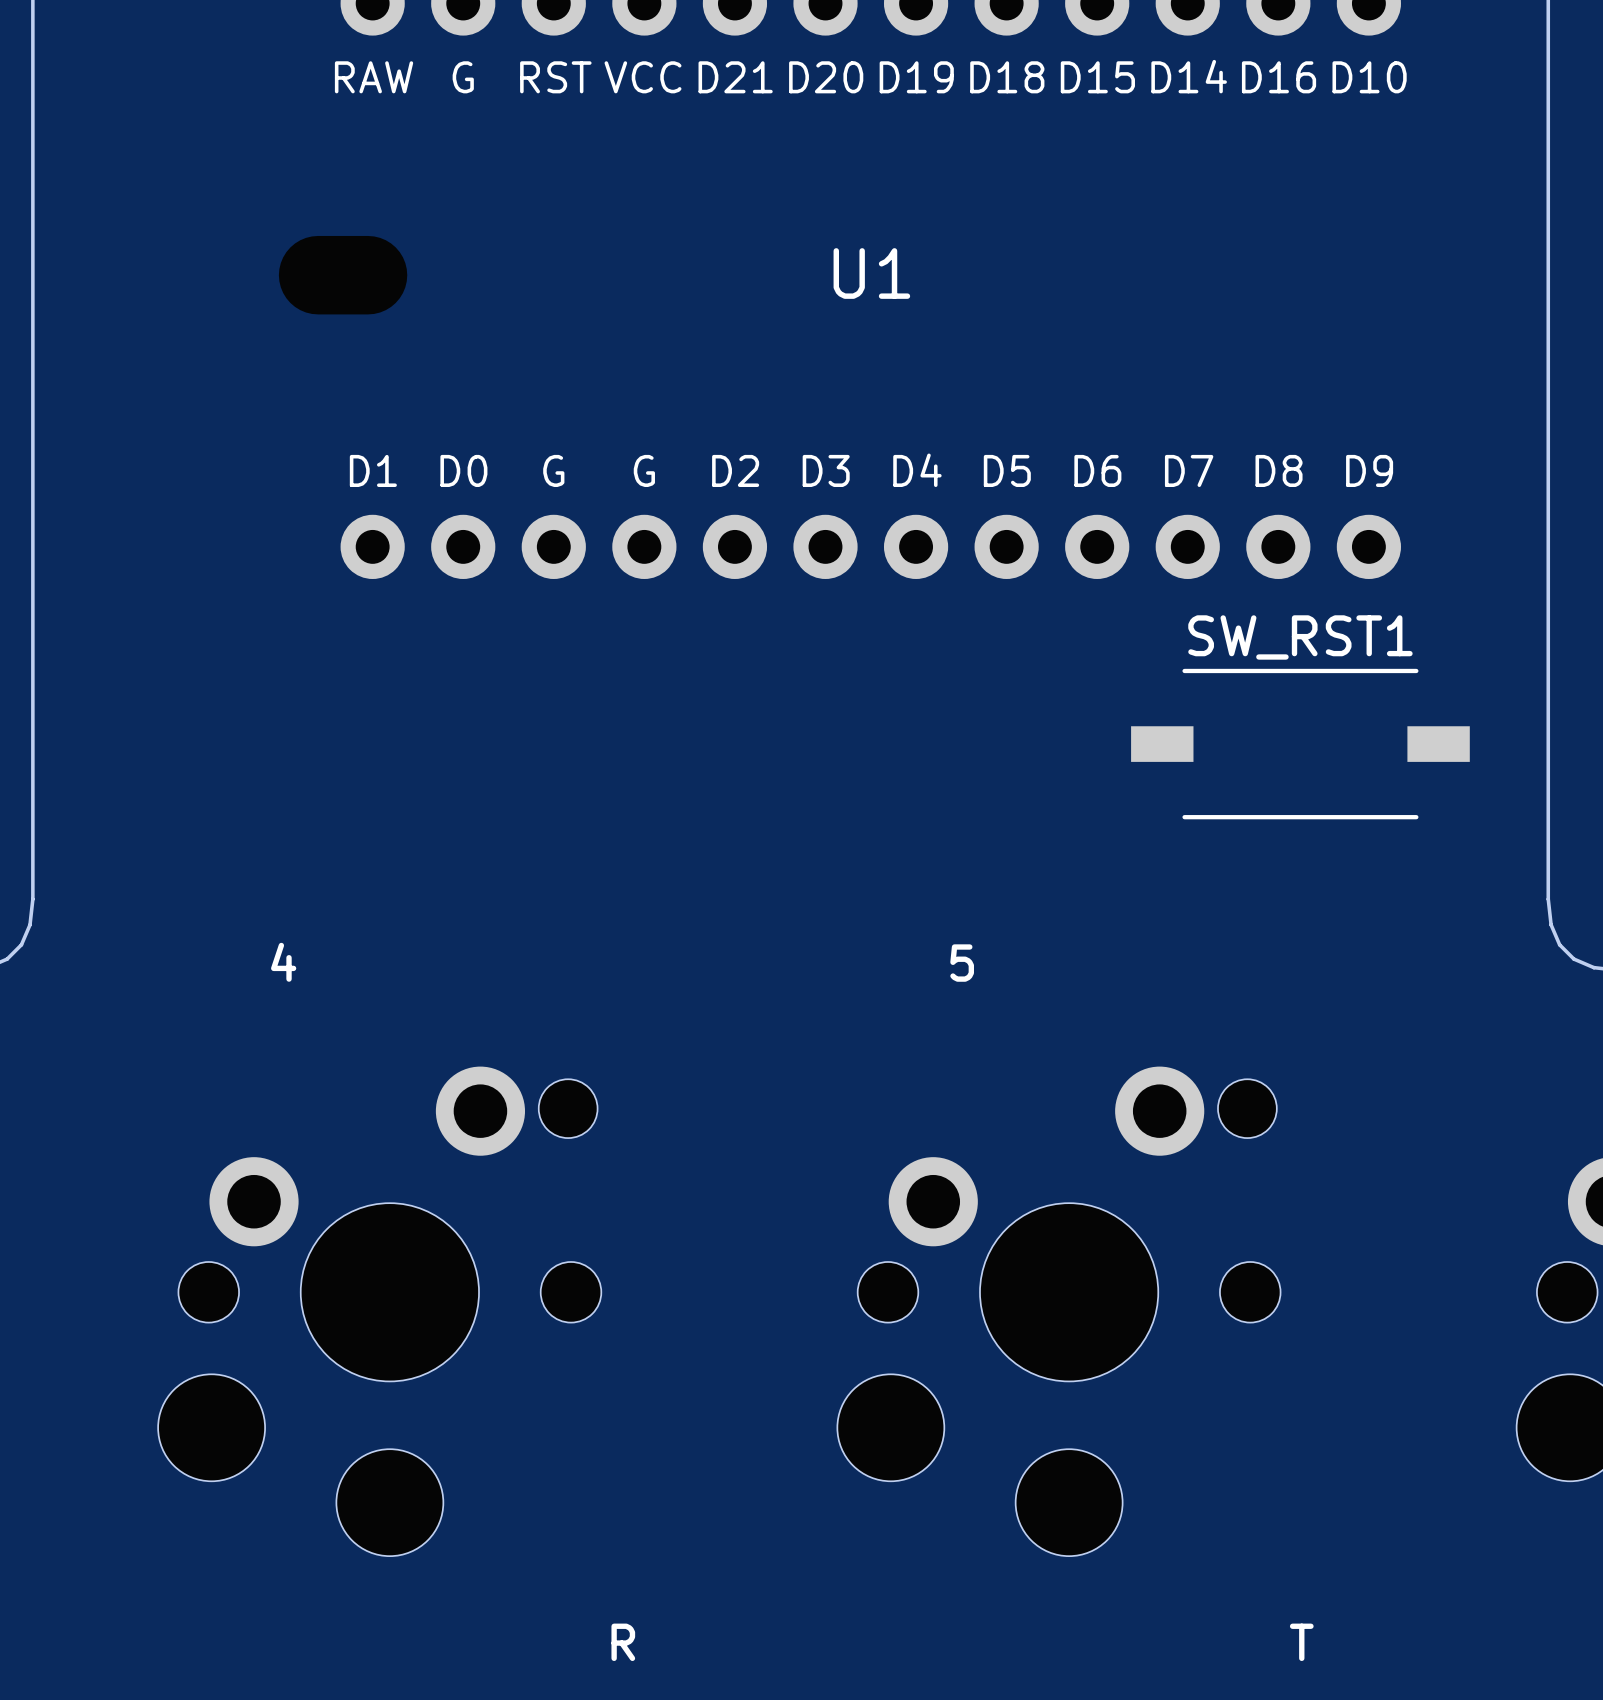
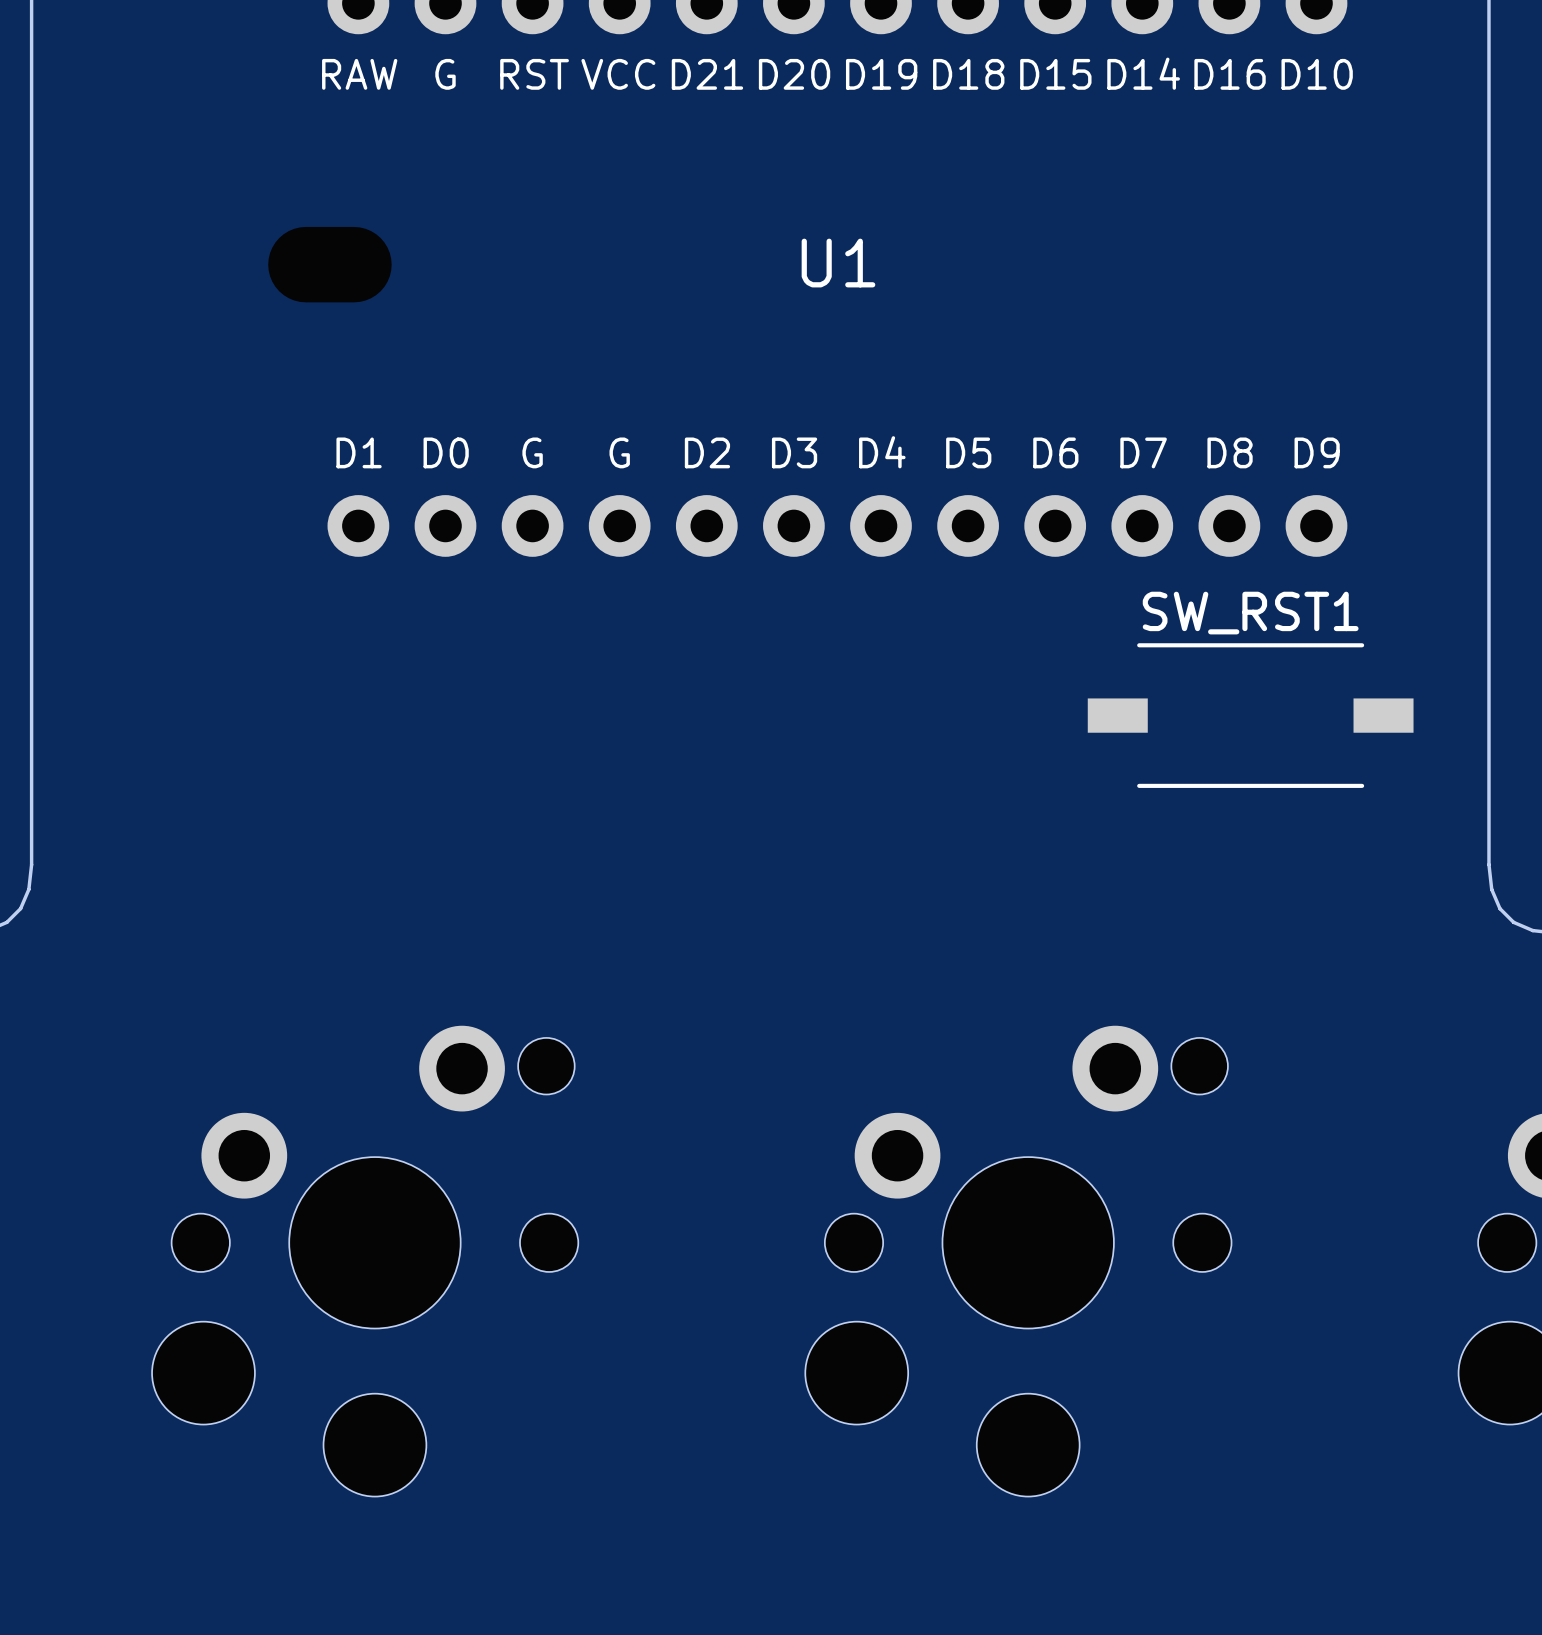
text: 4 (283, 962) -> none
text: 5 (962, 963) -> none
text: R (623, 1642) -> none
text: T (1301, 1642) -> none

